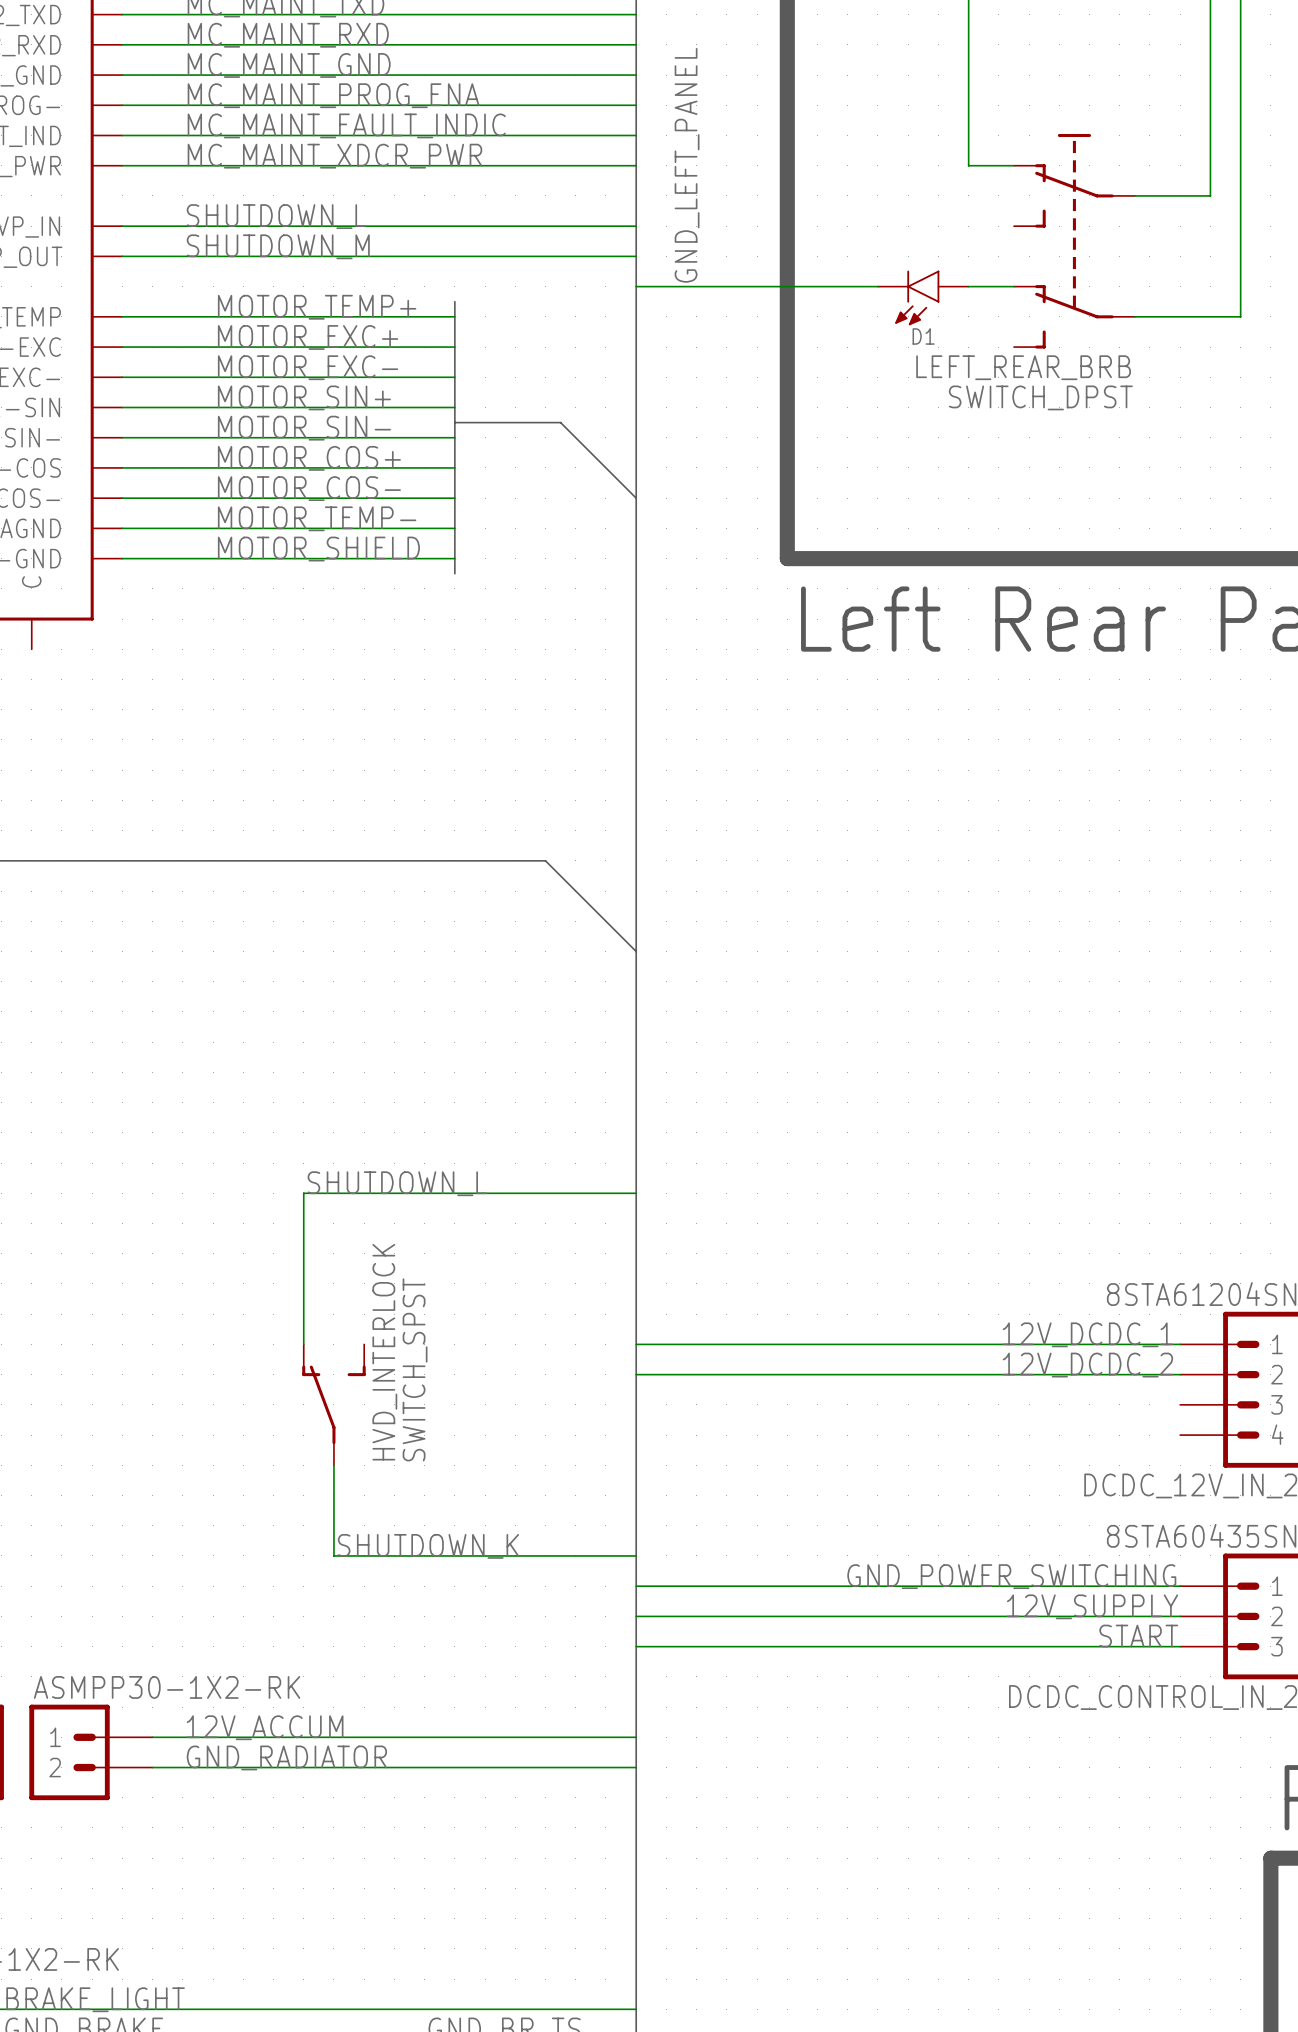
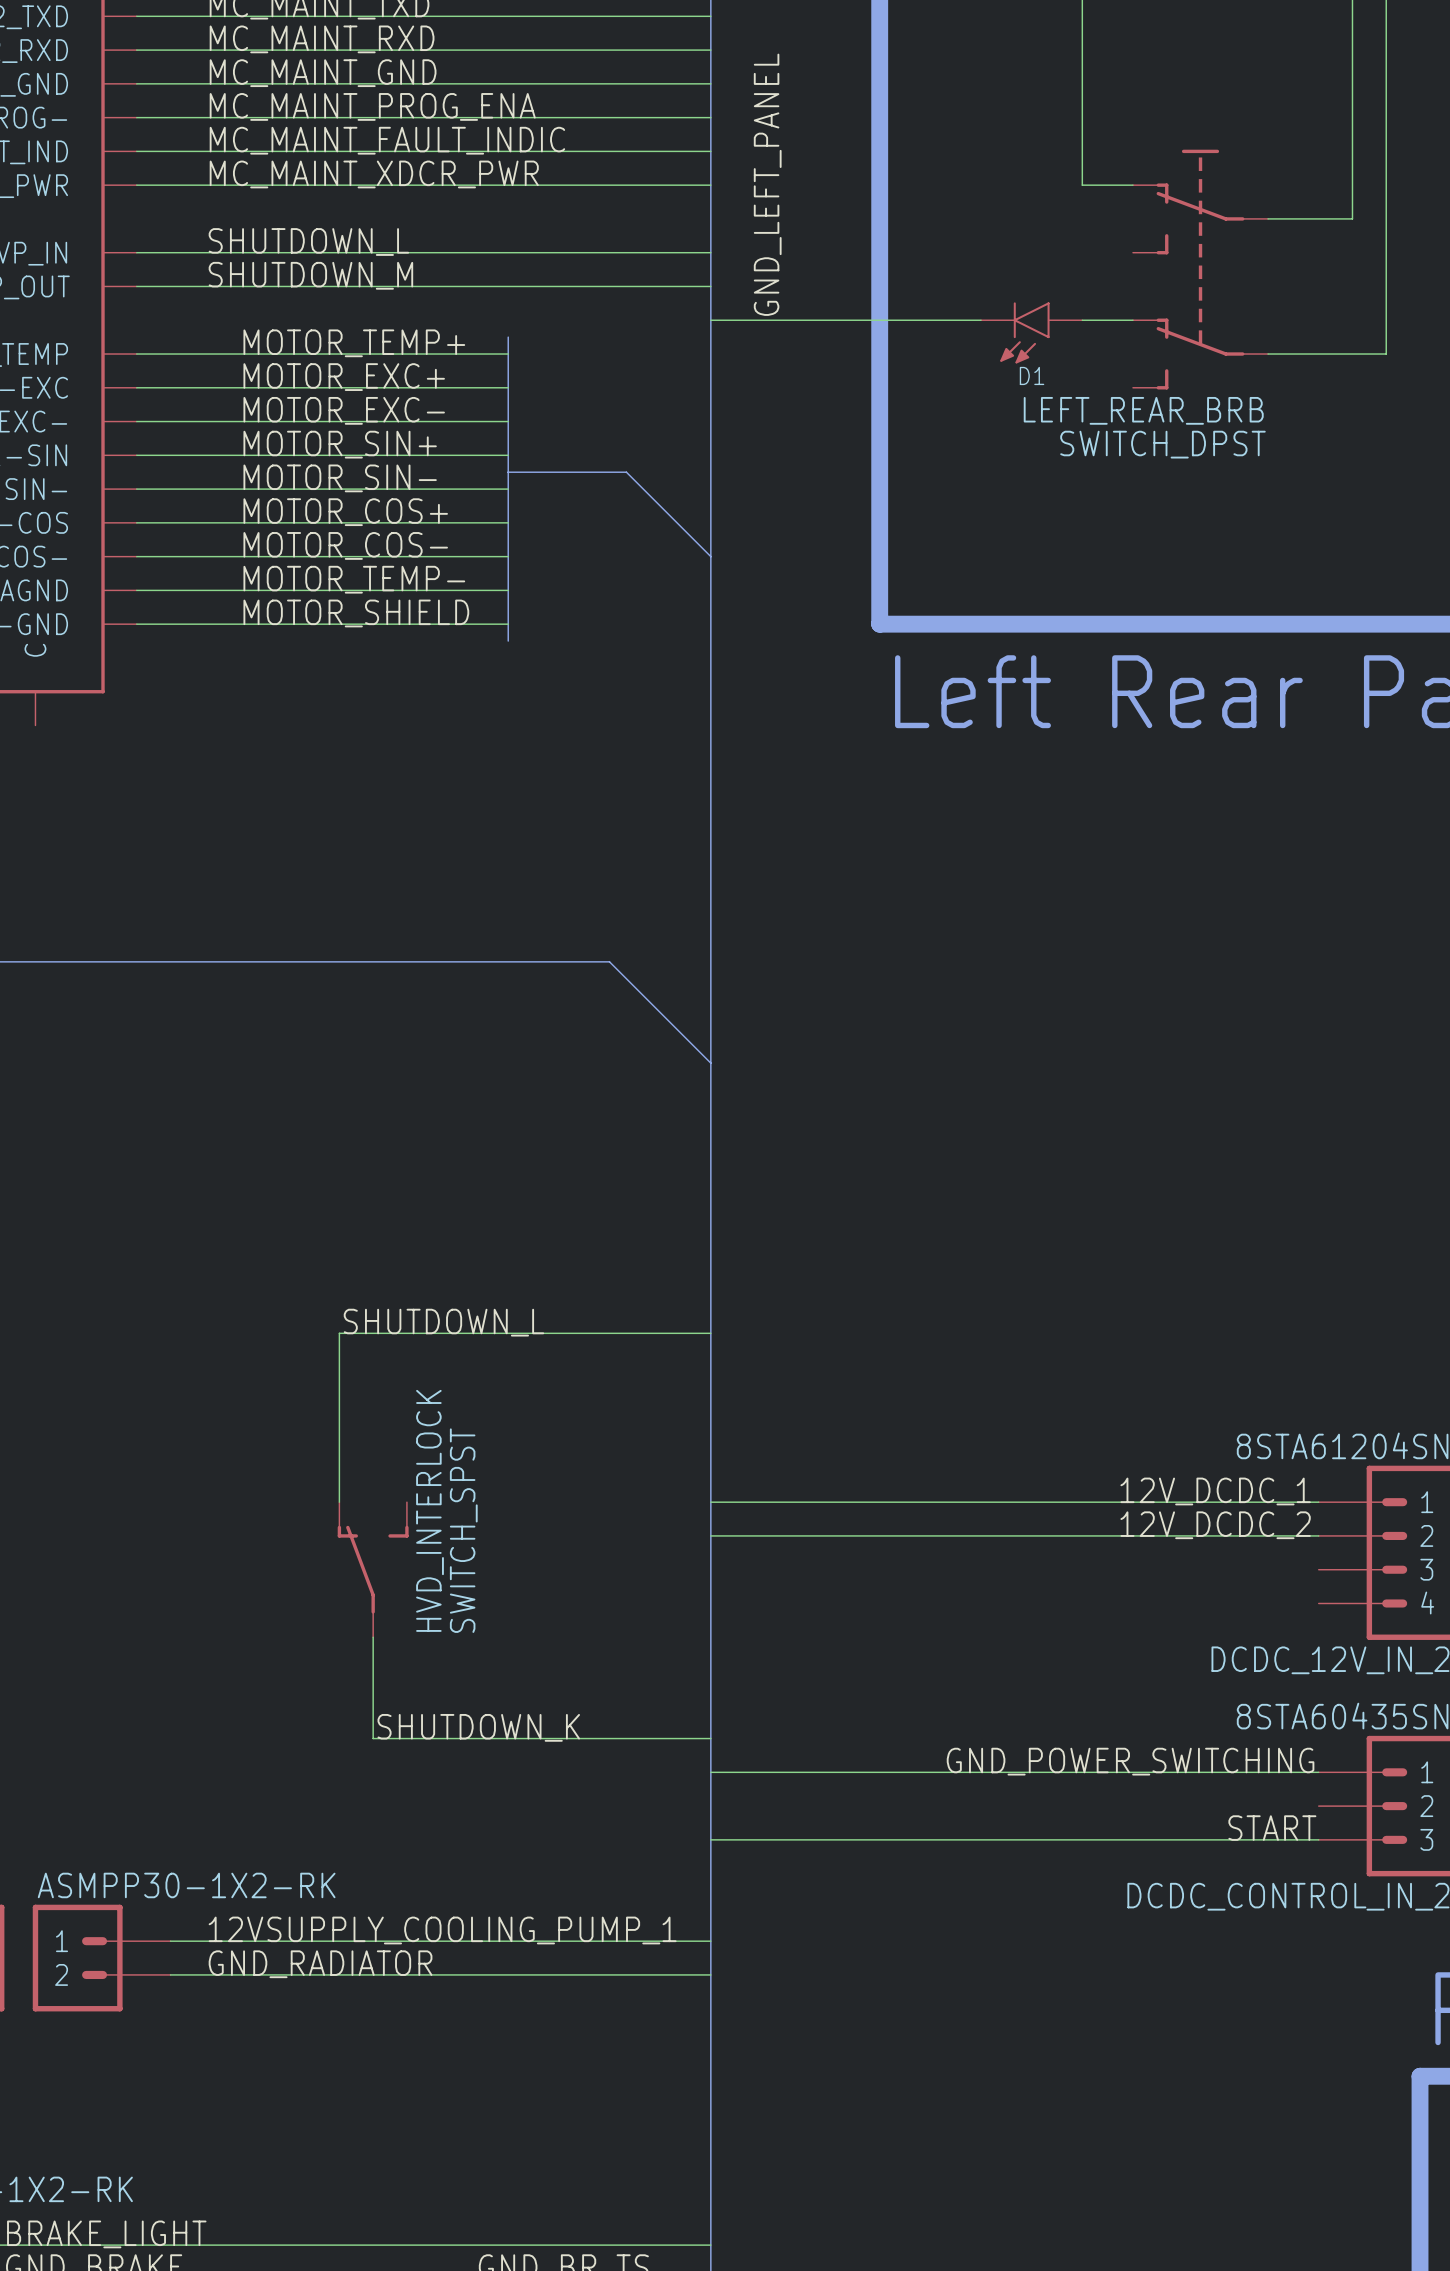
label: 12V_SUPPLY (1092, 1606) -> none
wire: (636, 1616) (1180, 1616) -> none
label: 12V_ACCUM (265, 1727) -> 12VSUPPLY_COOLING_PUMP_1 (442, 1930)

